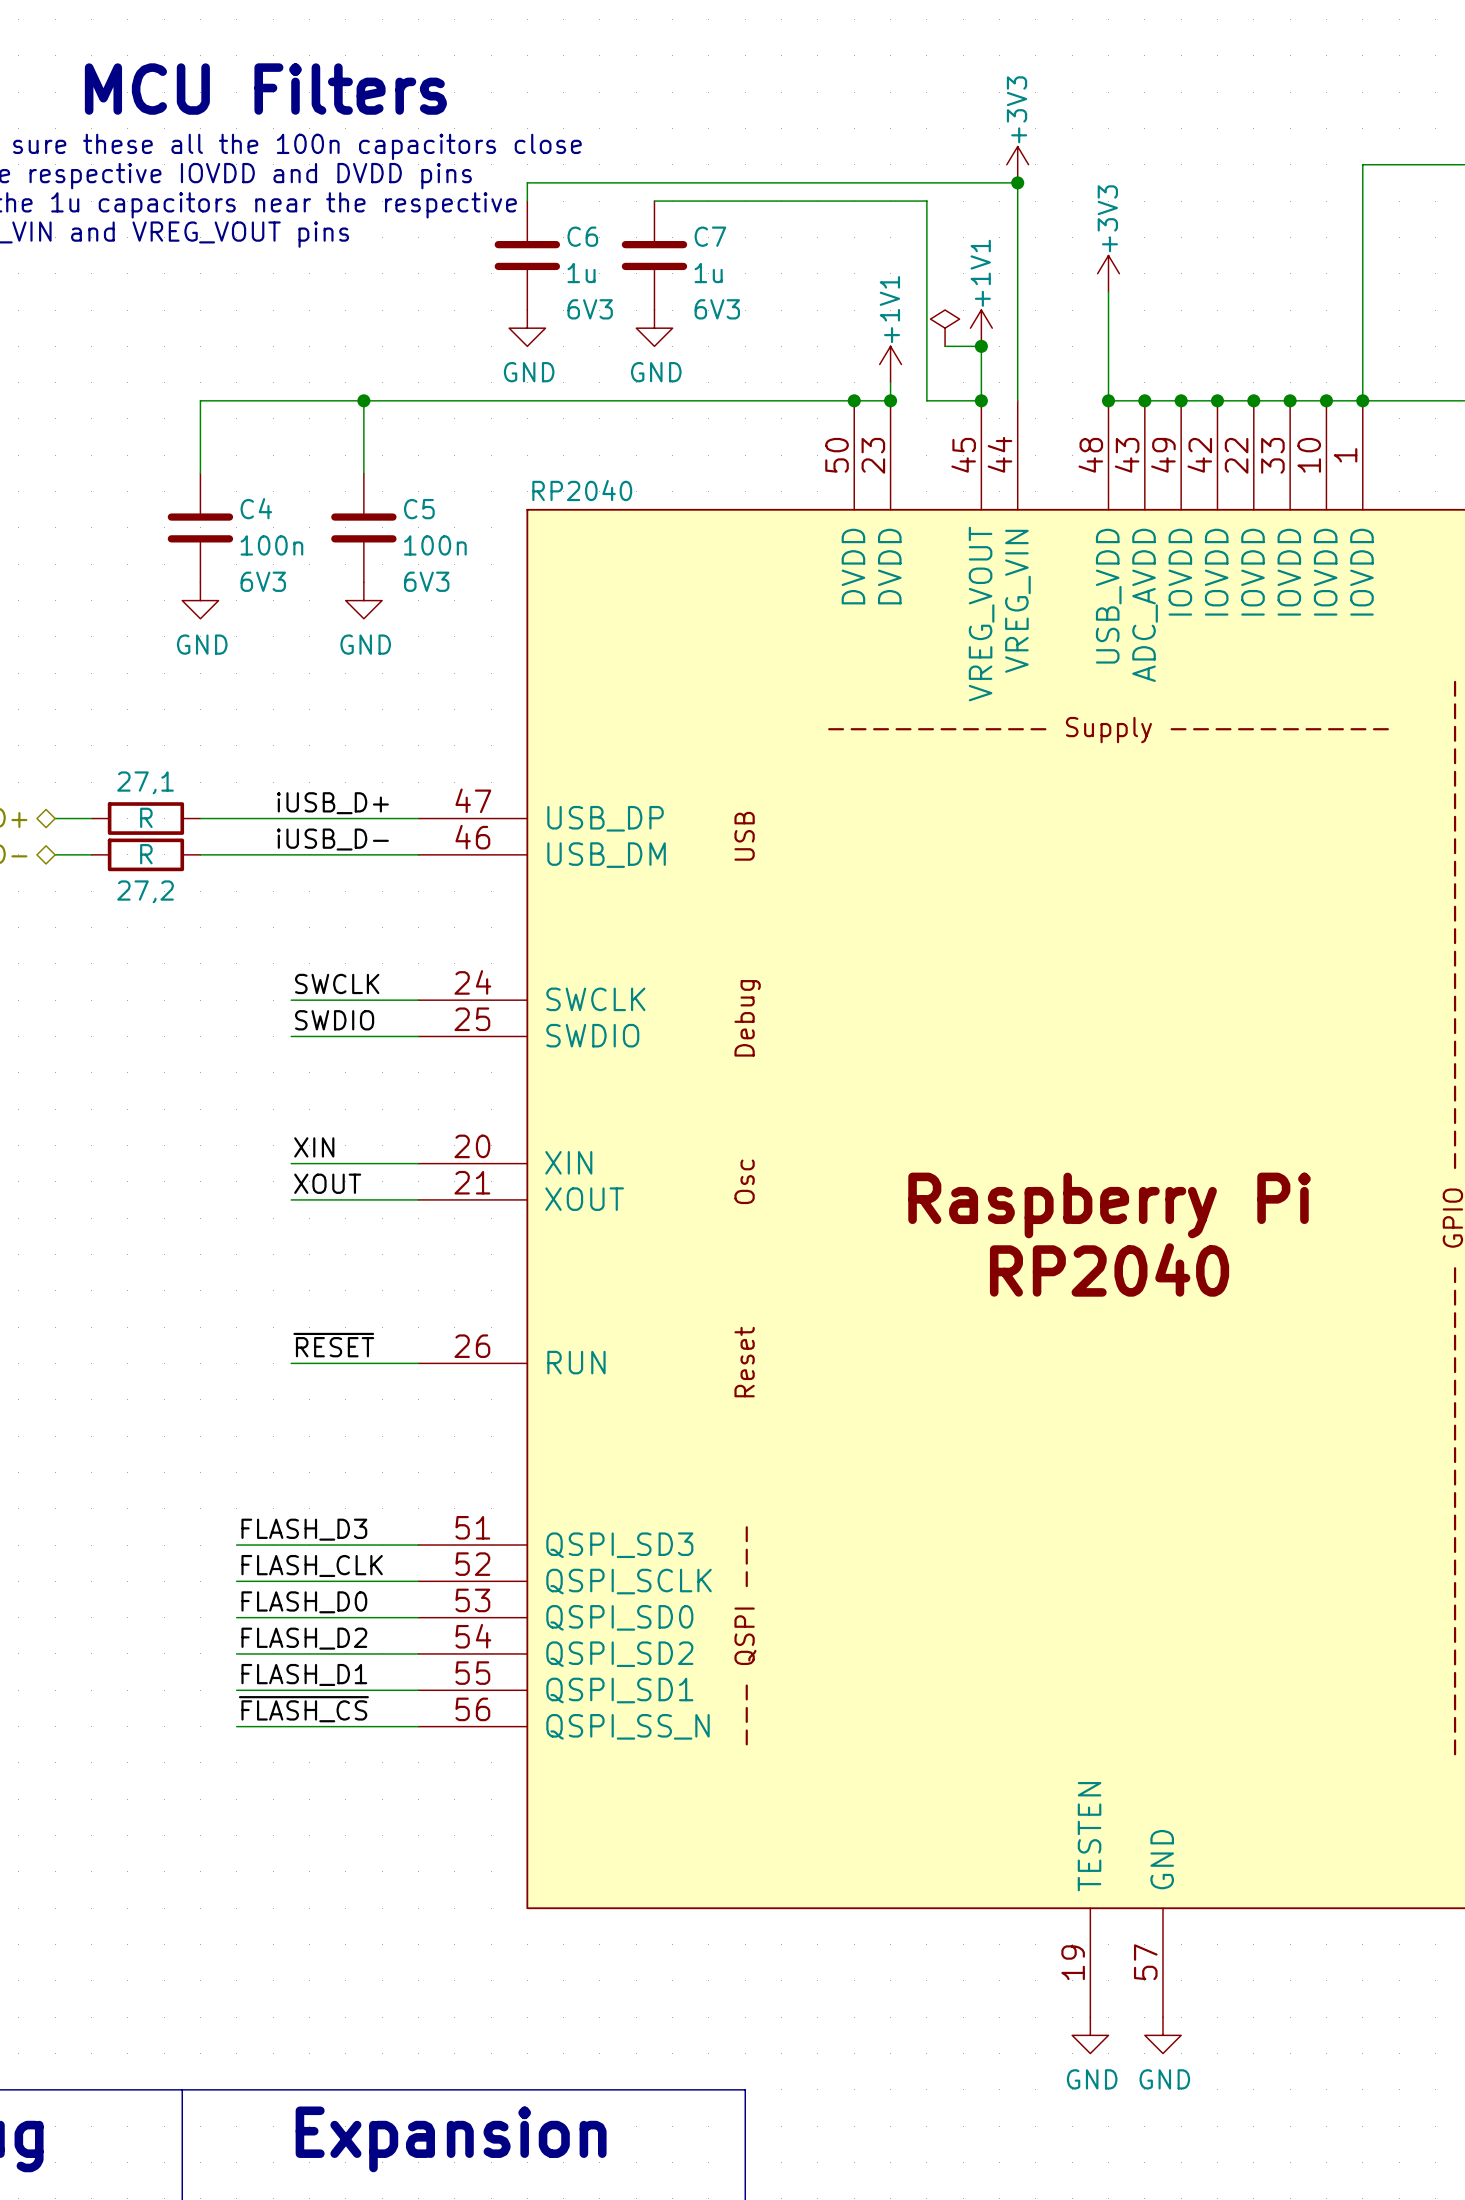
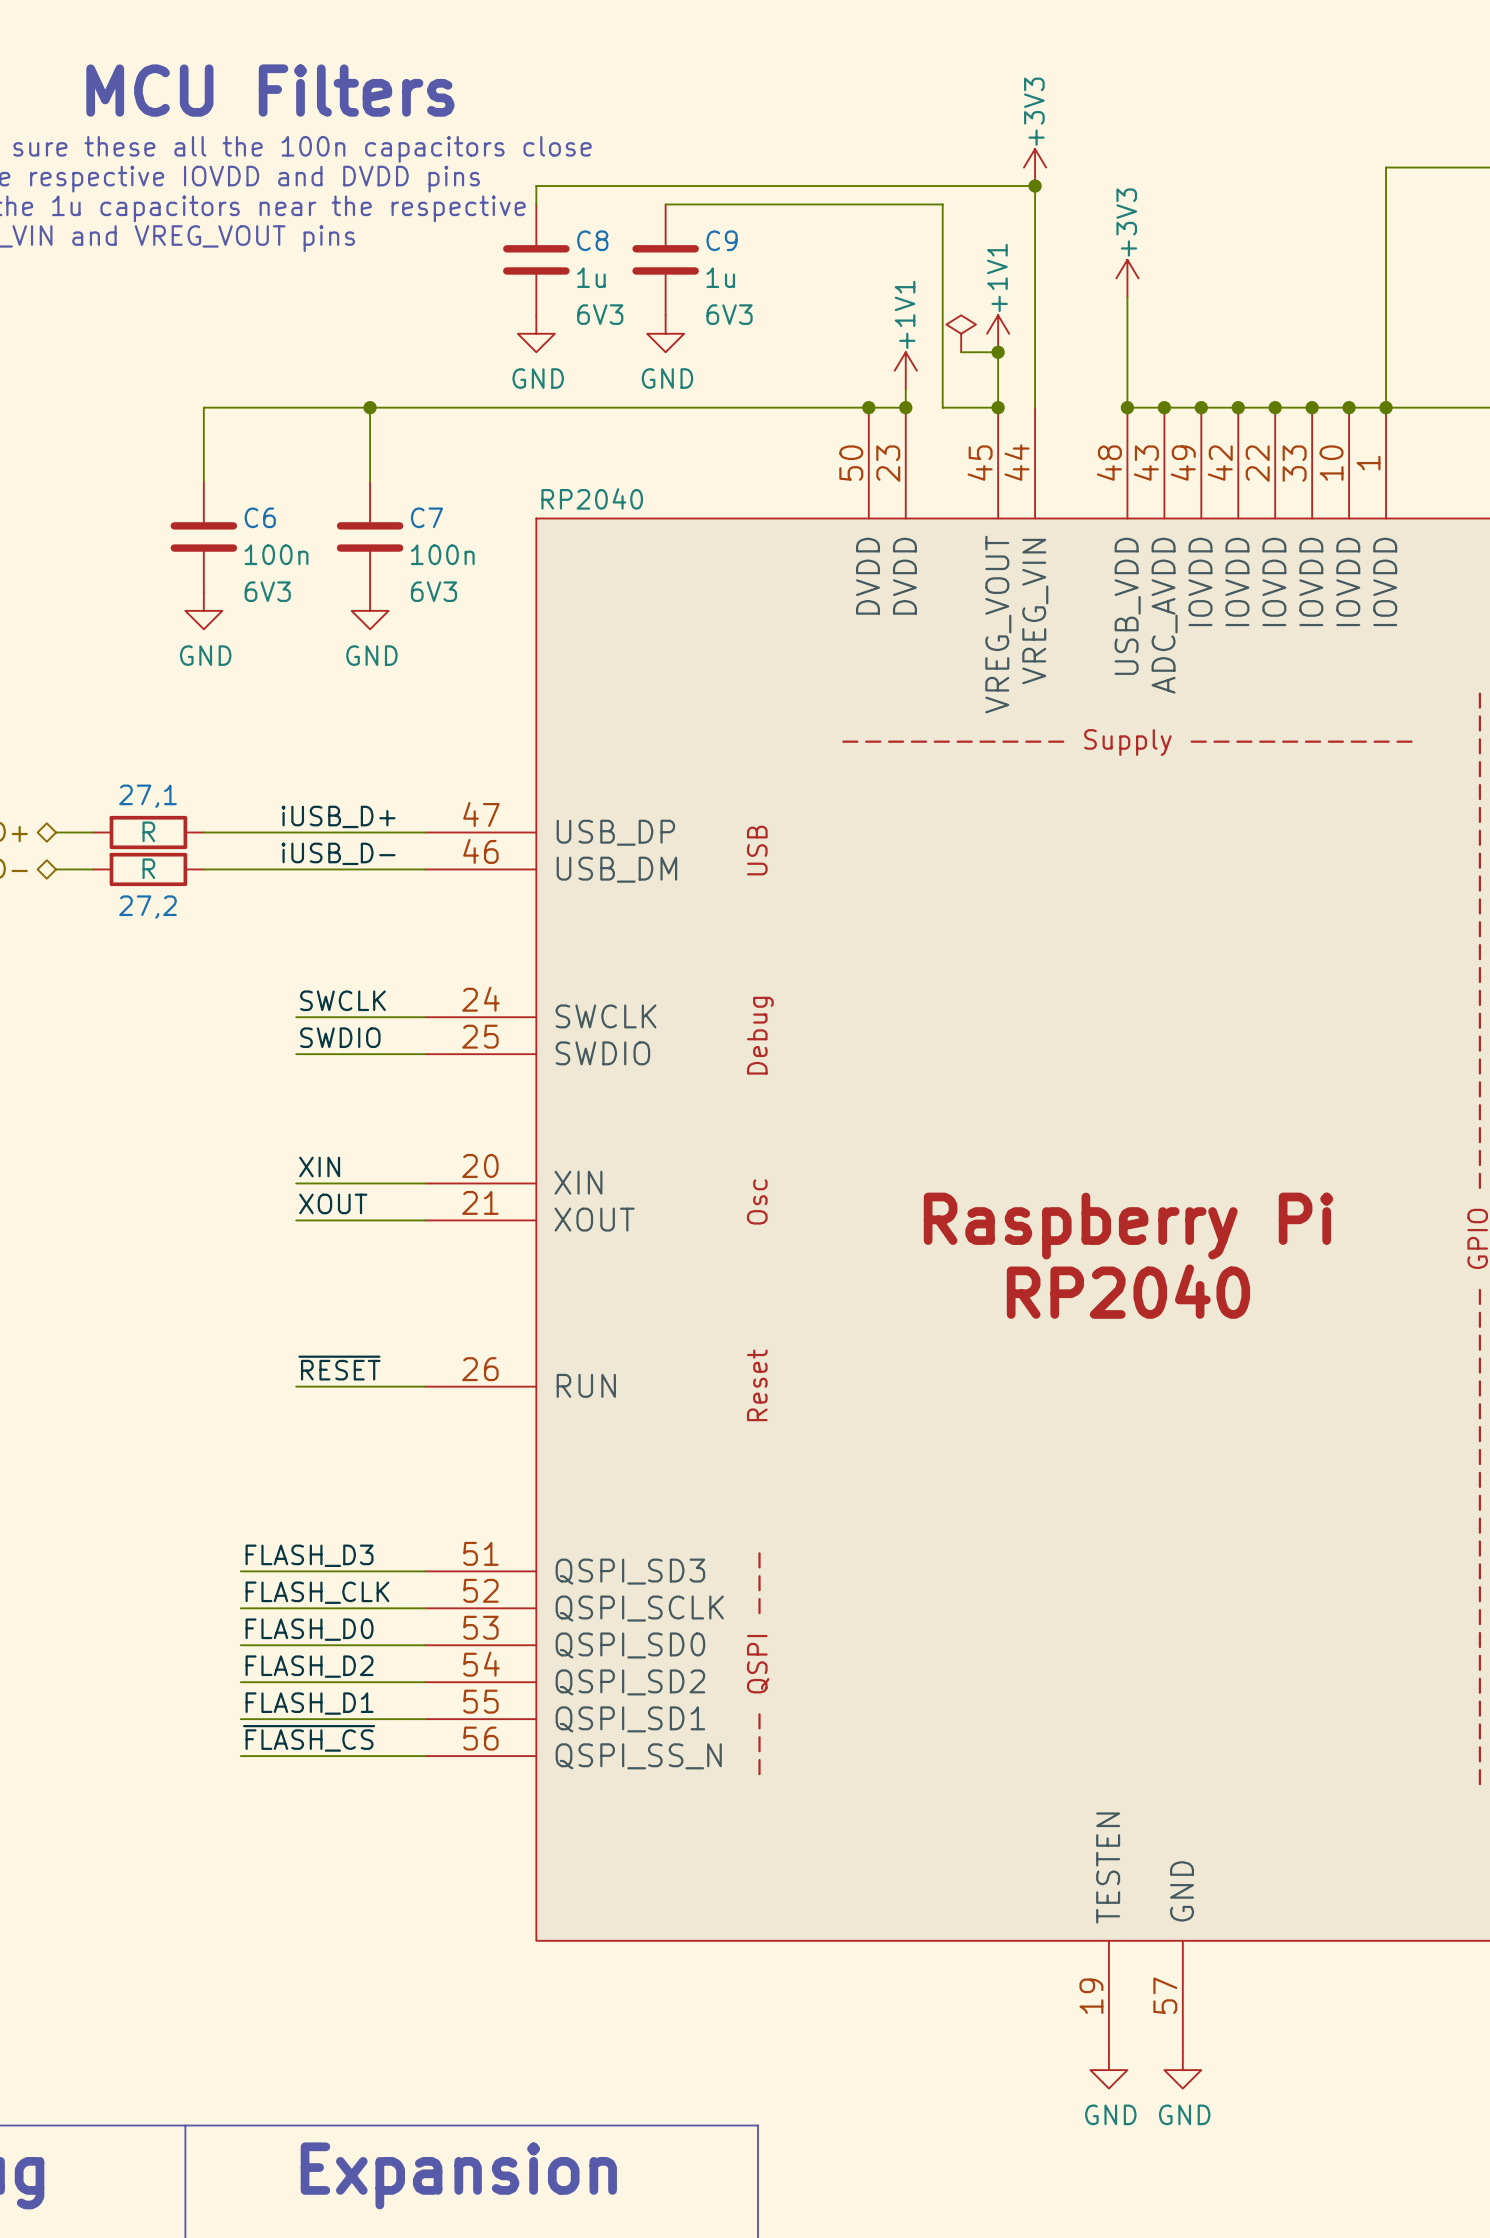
C6 name: C6 (582, 236) -> C8 (592, 240)
C7 name: C7 (710, 236) -> C9 (722, 240)
C4 name: C4 (256, 508) -> C6 (260, 517)
C5 name: C5 (419, 509) -> C7 (426, 517)

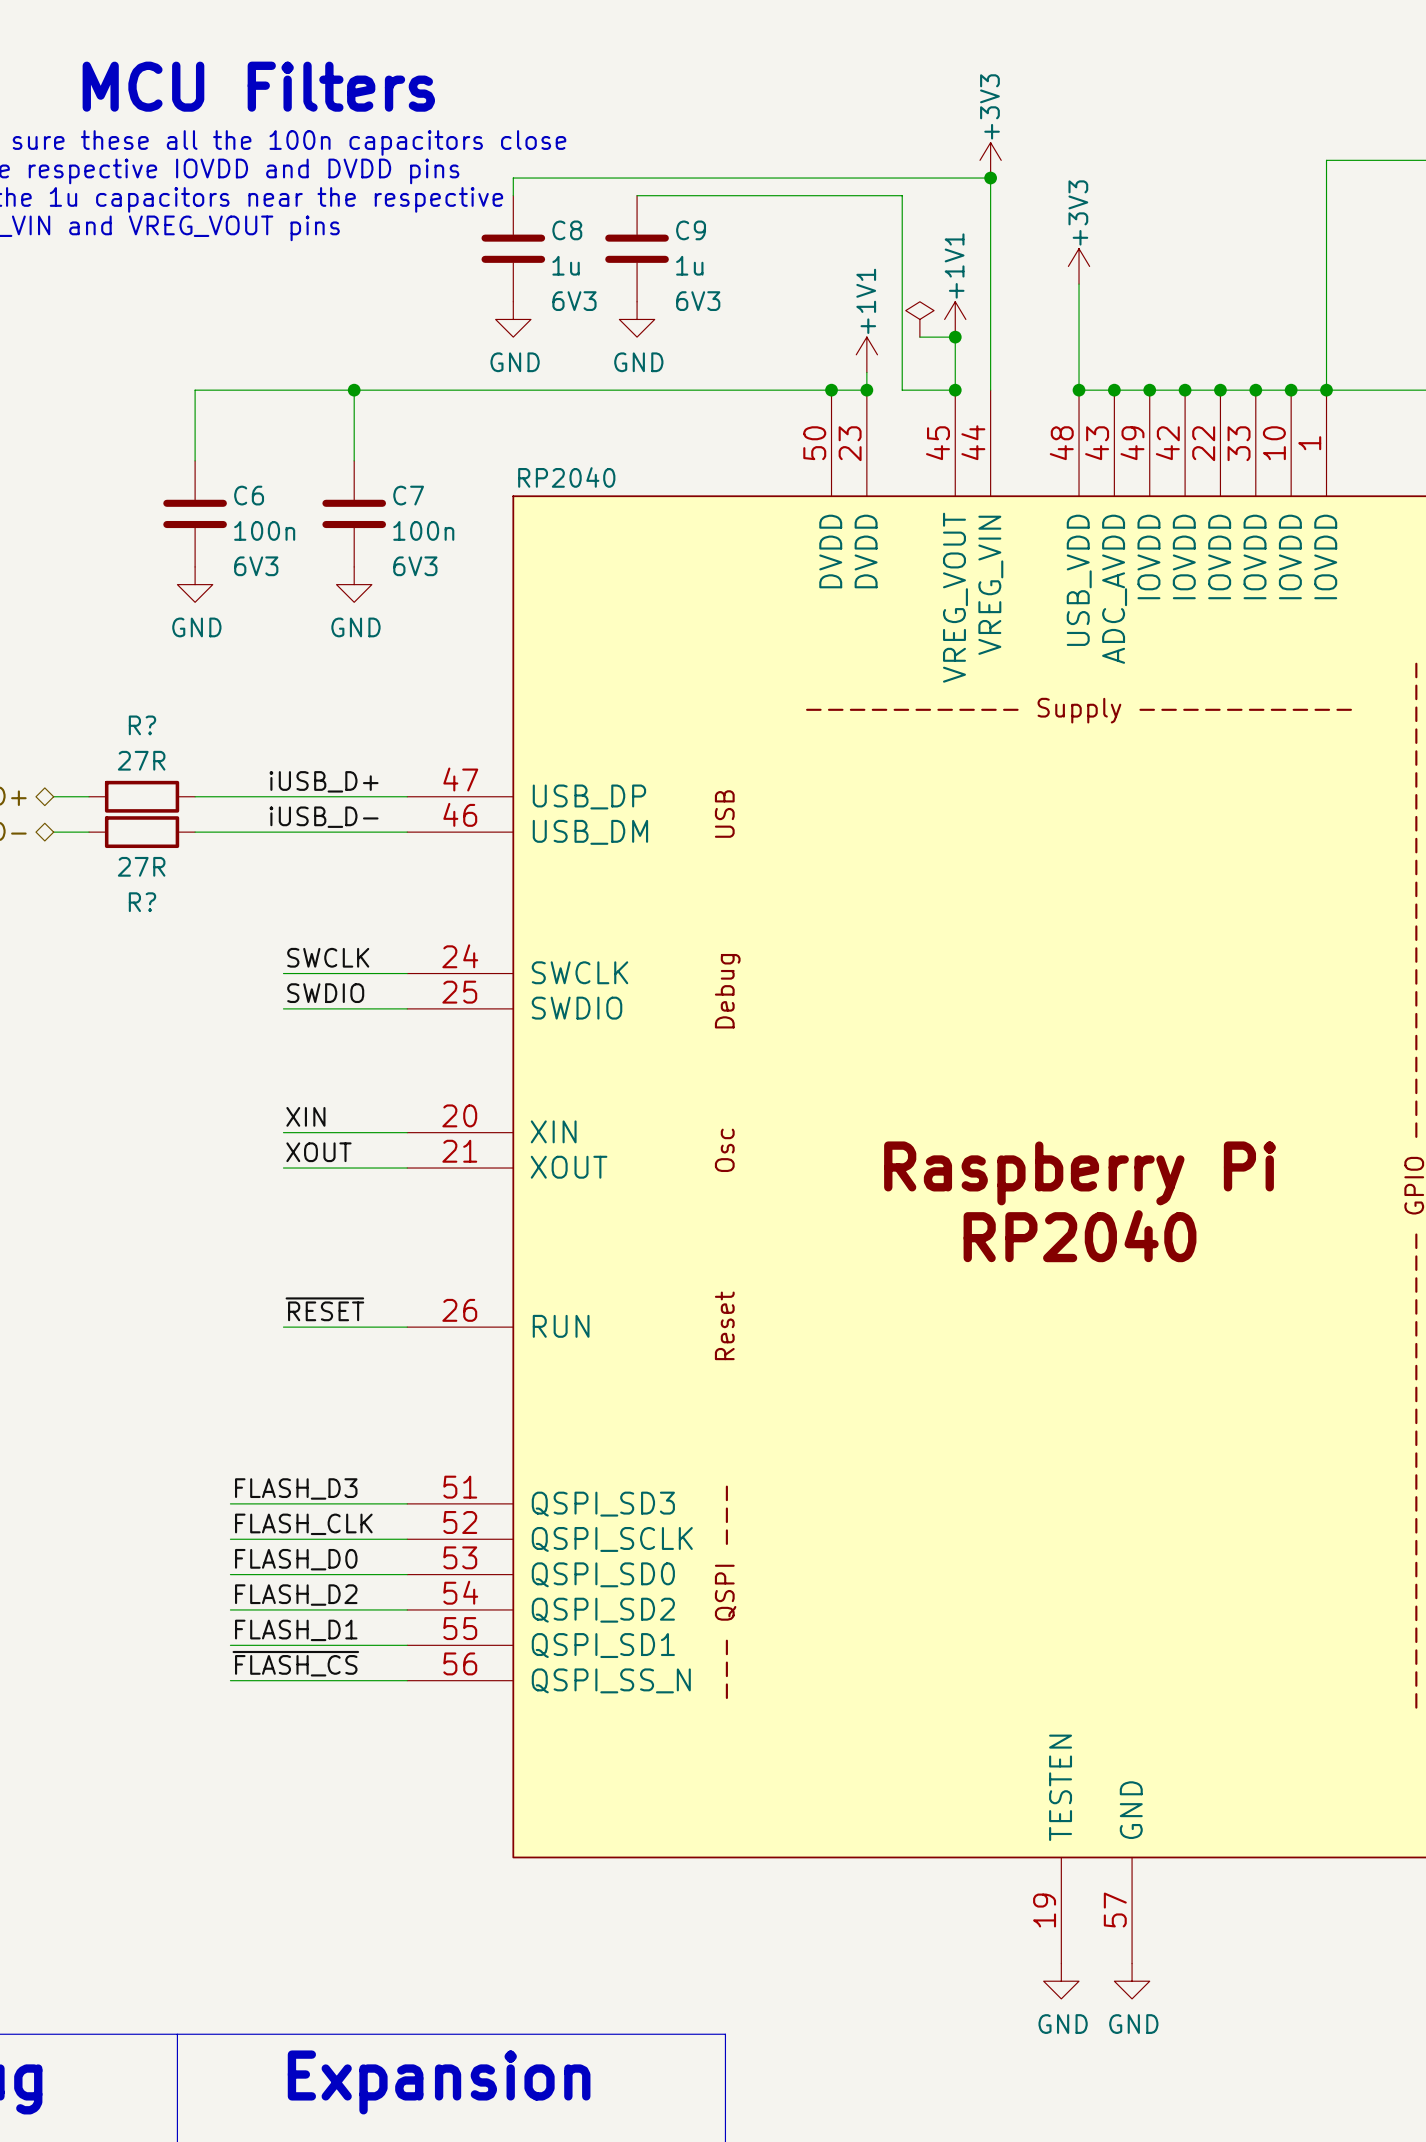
27,1 name: 27,1 (147, 796) -> R? (142, 725)
27,1 value: R (148, 831) -> 27R (141, 760)
27,2 value: R (148, 868) -> 27R (141, 866)
27,2 name: 27,2 (147, 907) -> R? (142, 902)

